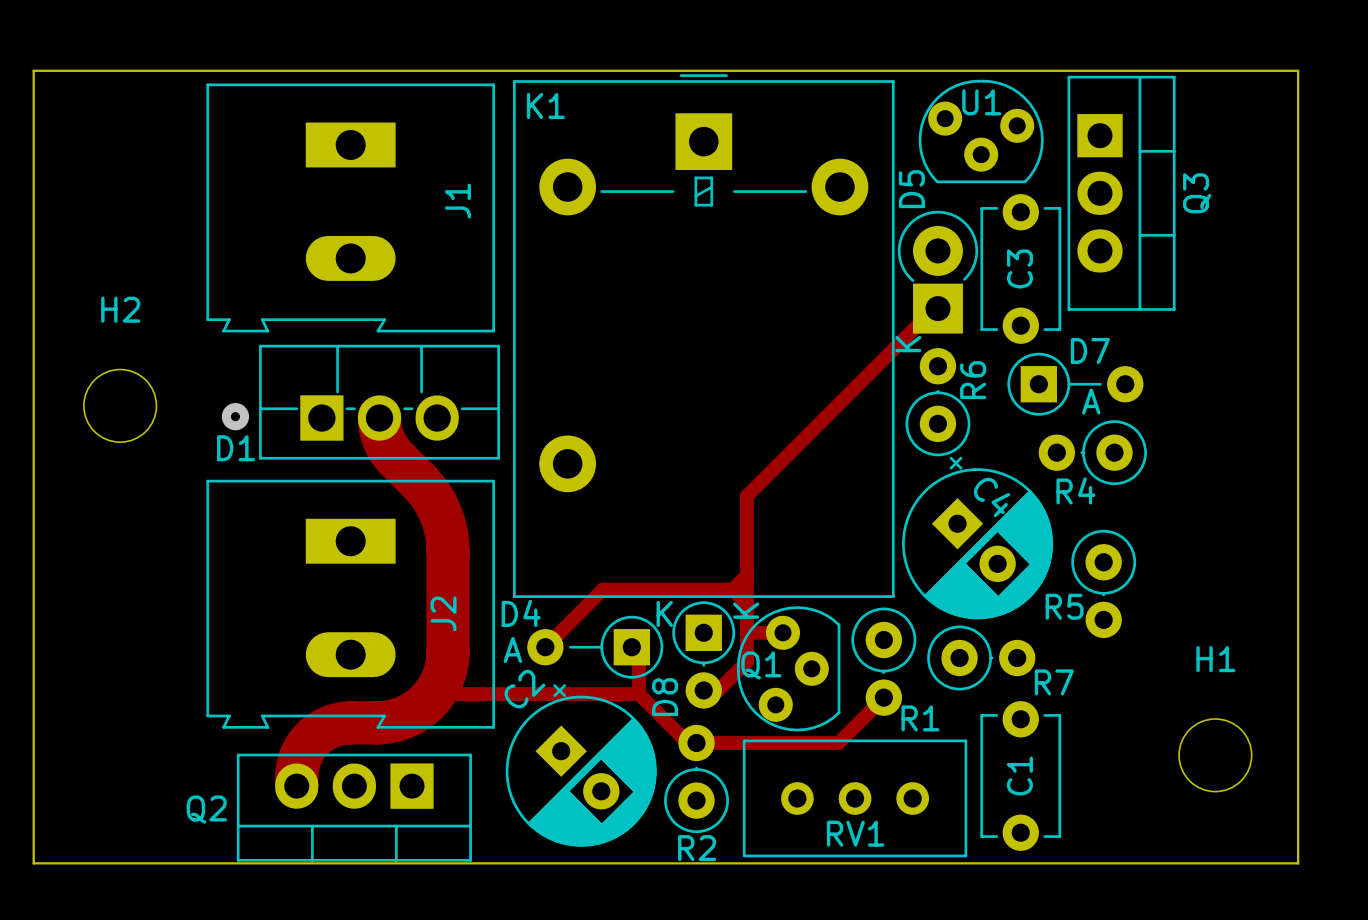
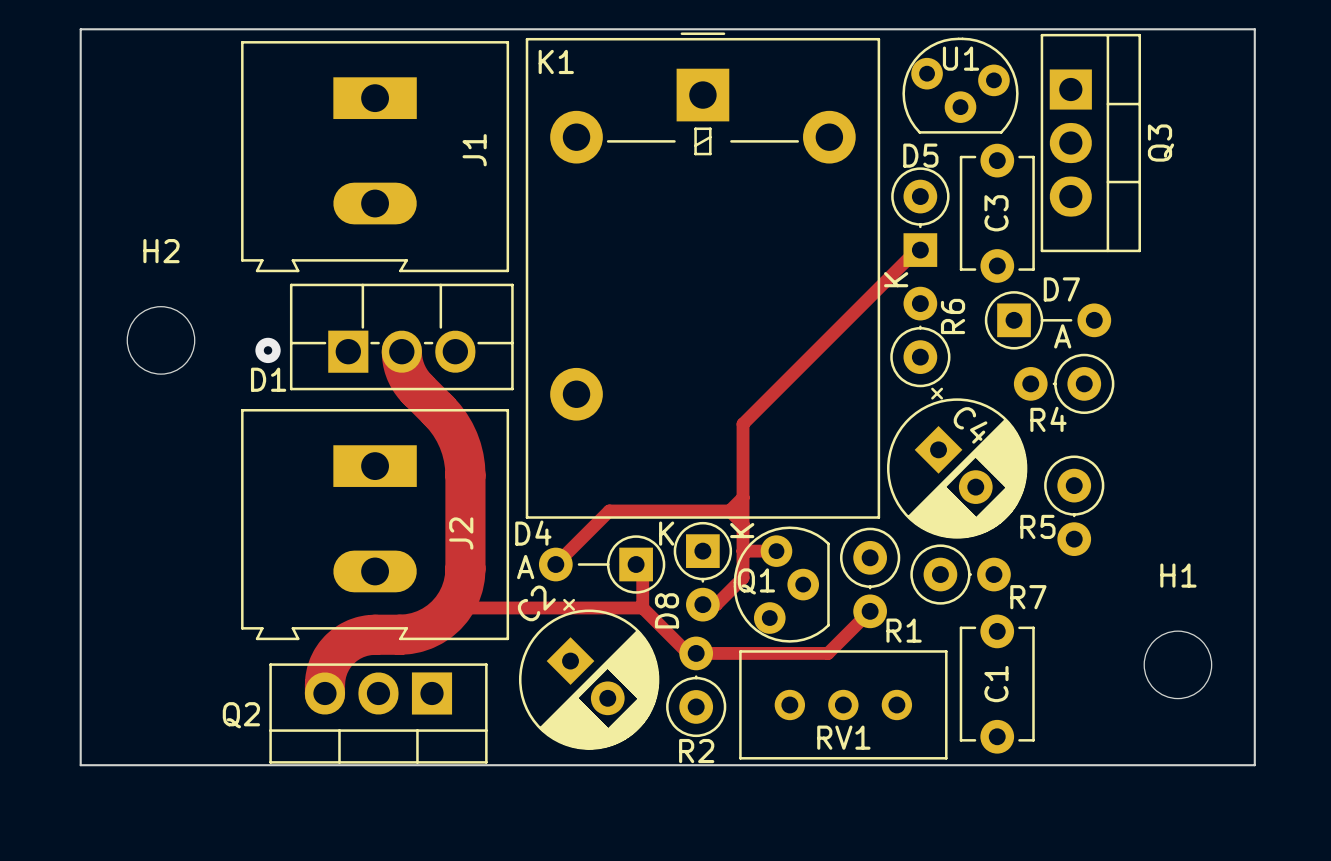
D5 footprint: [897, 210, 979, 334] -> [891, 167, 950, 267]

